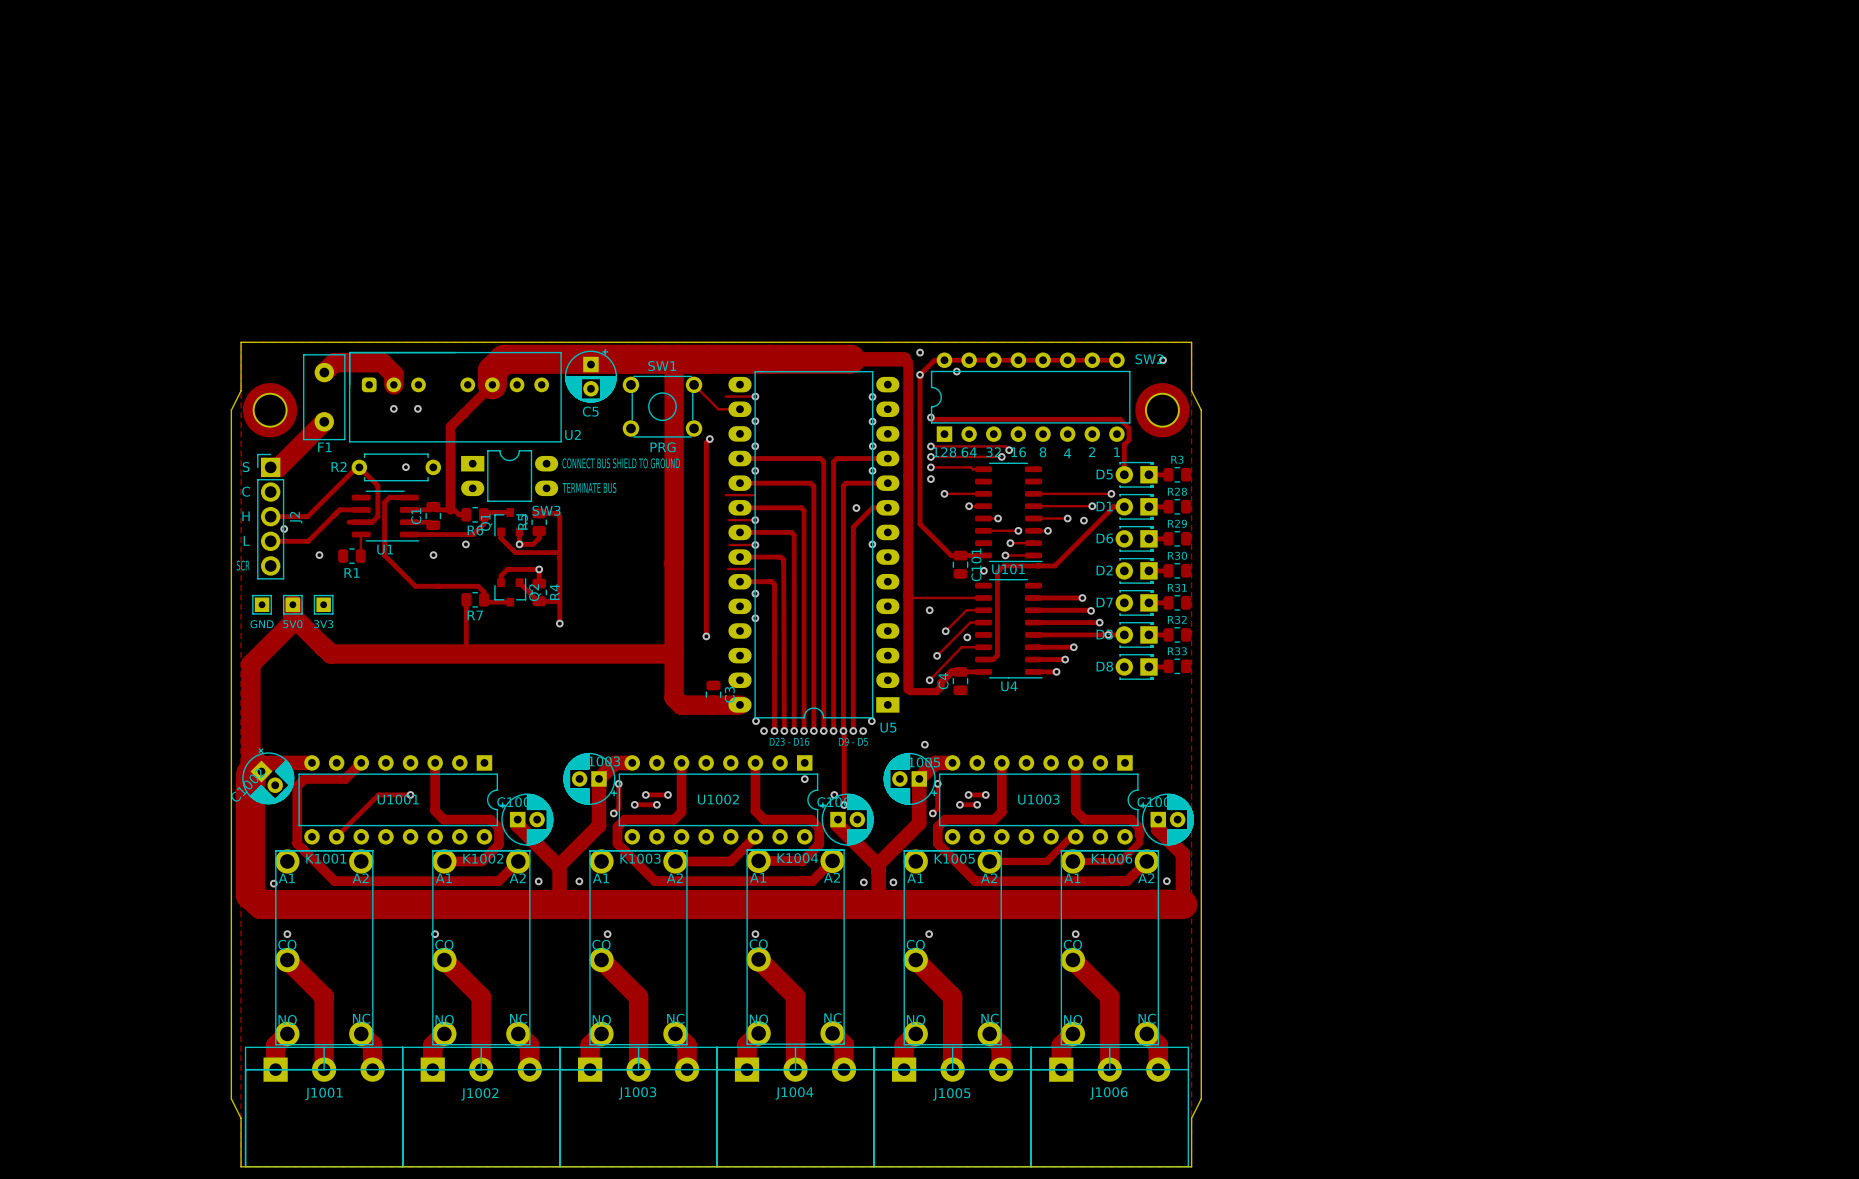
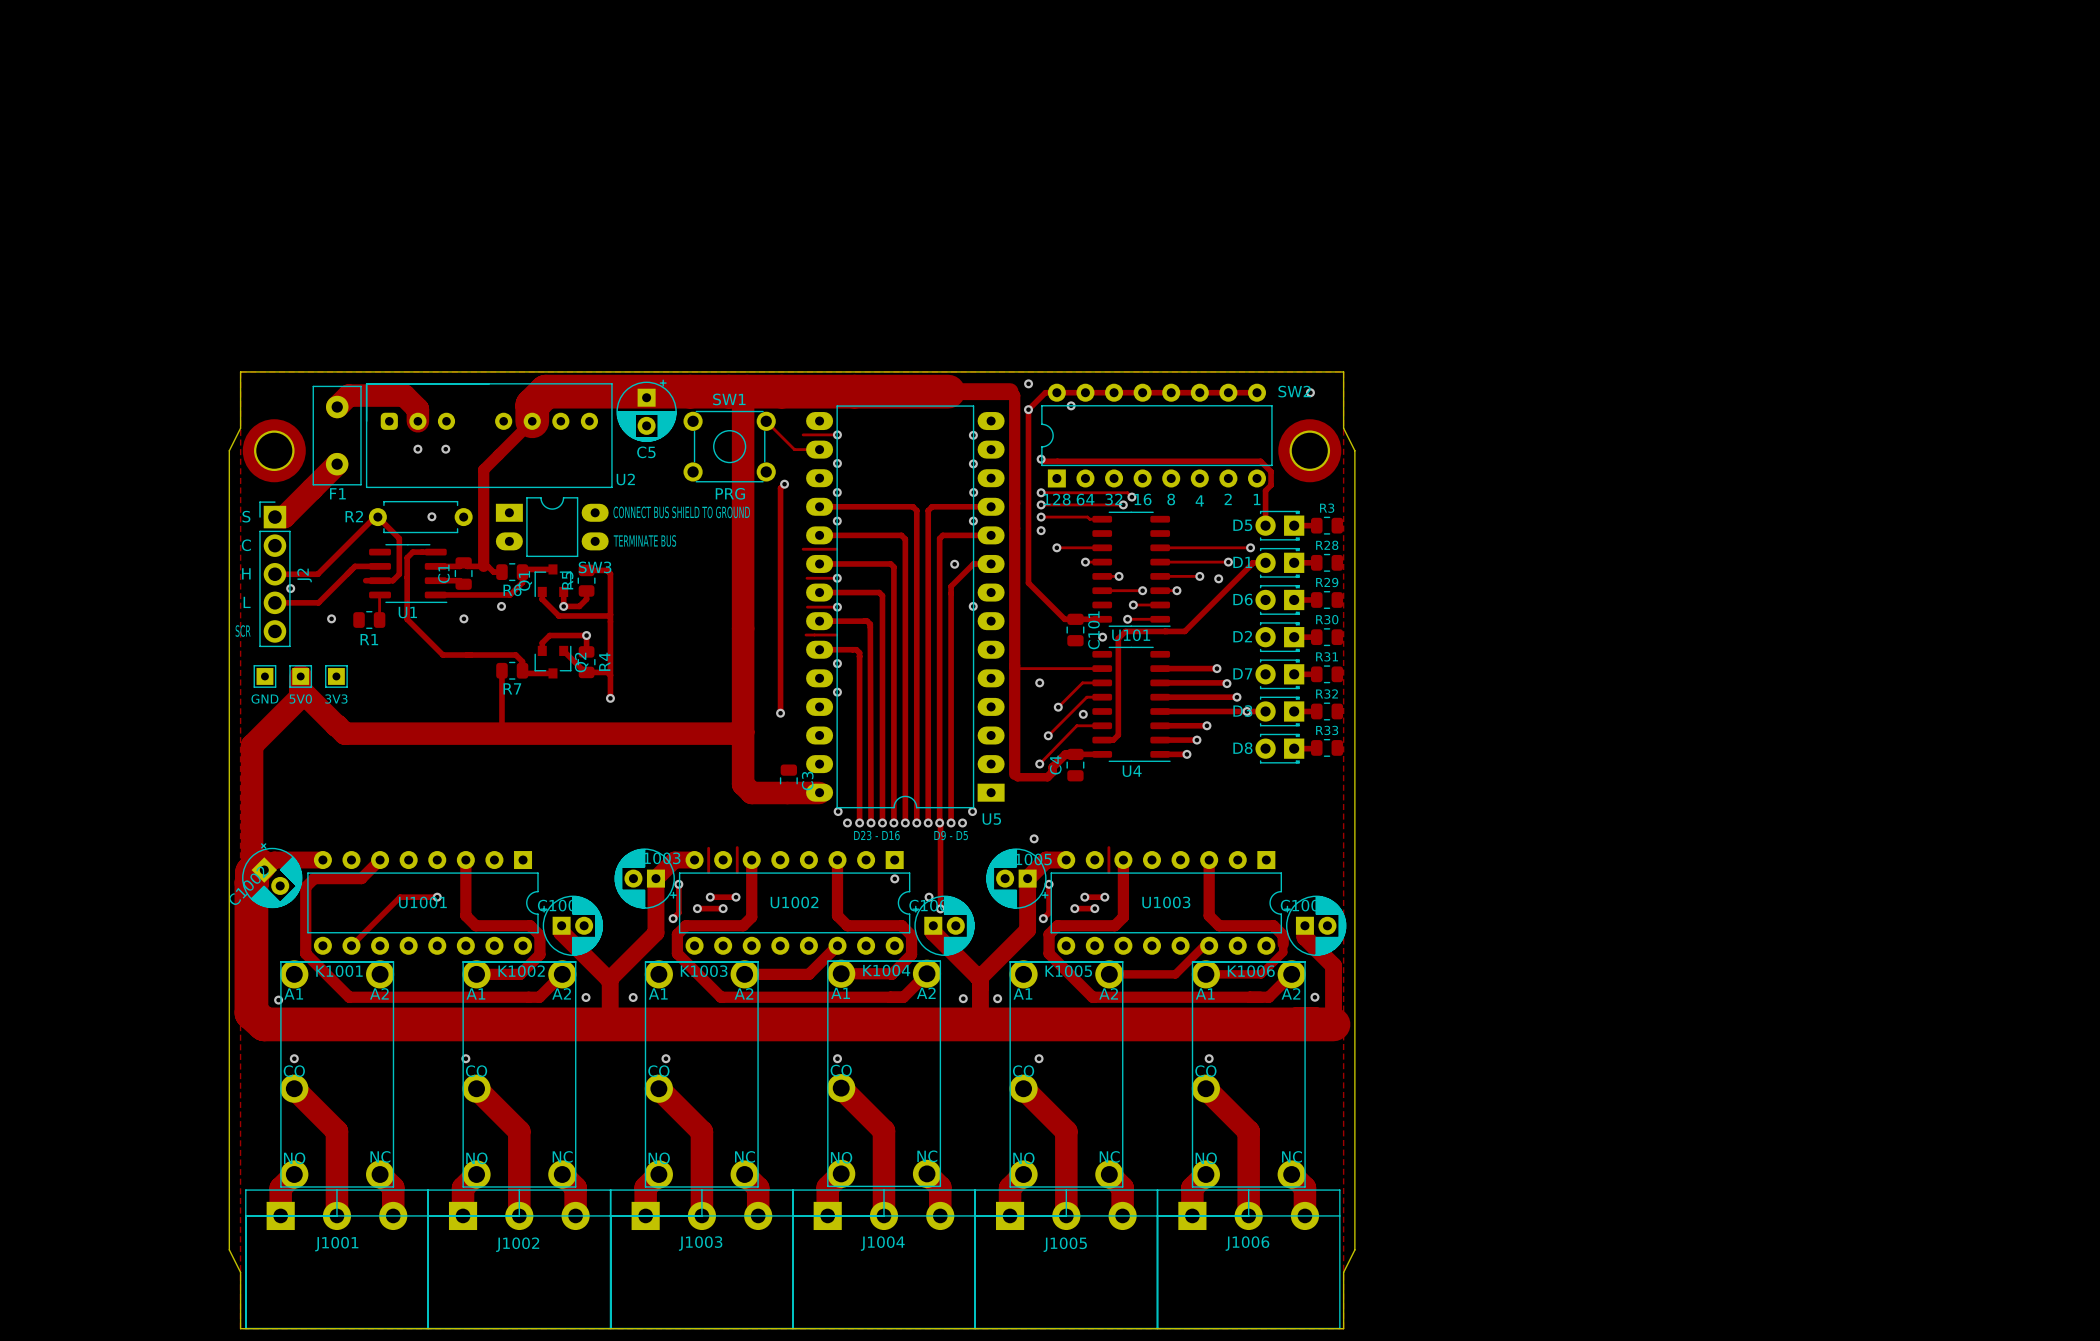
track: none -> (708, 848) (708, 872)
track: none -> (737, 847) (737, 872)
track: none -> (1108, 847) (1108, 872)

